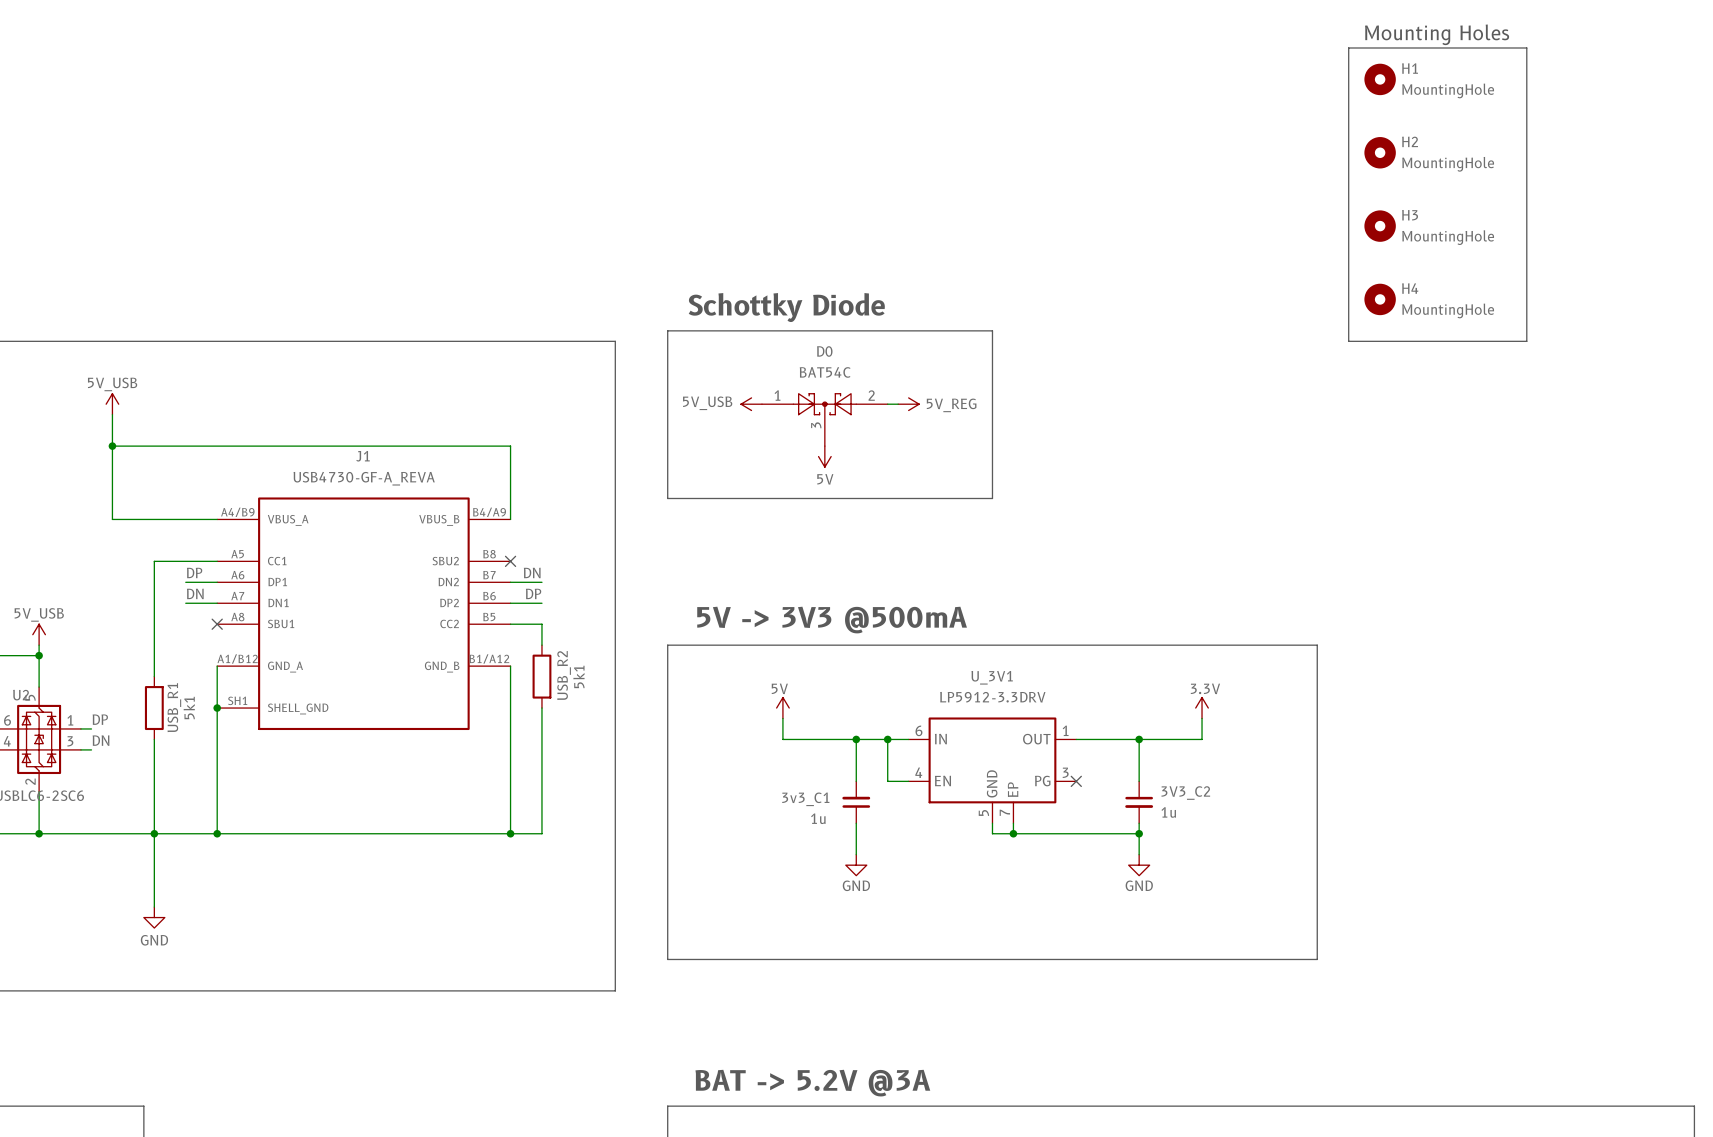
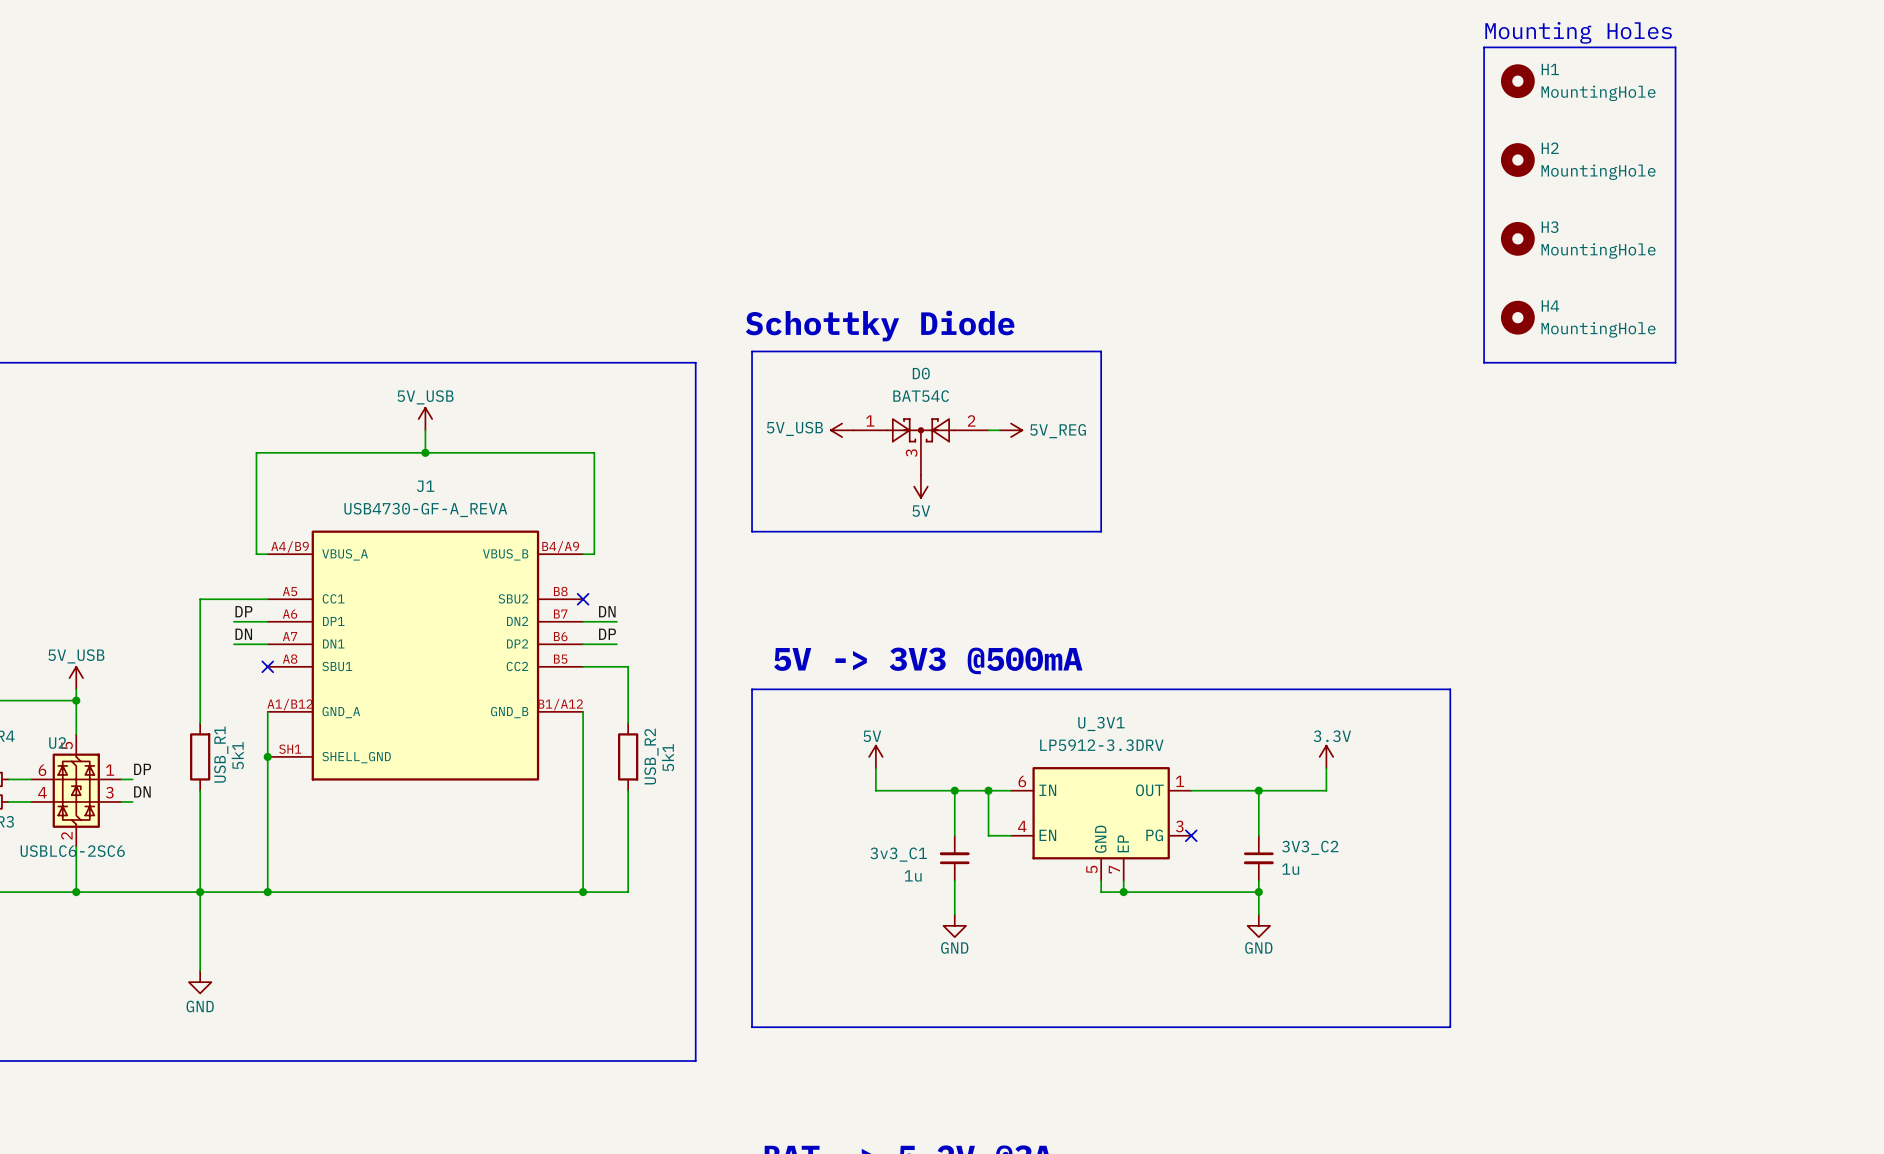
power symbol: none -> 5V_USB (425, 419)
power symbol: 5V_USB (112, 404) -> none
wire: none -> (425, 430) (425, 452)
wire: (112, 414) (112, 519) (206, 519) -> none
junction: none -> (425, 452)
wire: (112, 446) (510, 446) (510, 519) -> (256, 554) (256, 452) (594, 452) (594, 554) (583, 554)
junction: (112, 446) -> none
wire: (541, 624) (541, 645) -> (616, 666) (628, 666) (628, 723)
USB_R2 position: (541, 676) -> (628, 756)
wire: (541, 708) (541, 833) -> (628, 790) (628, 892) (616, 892)

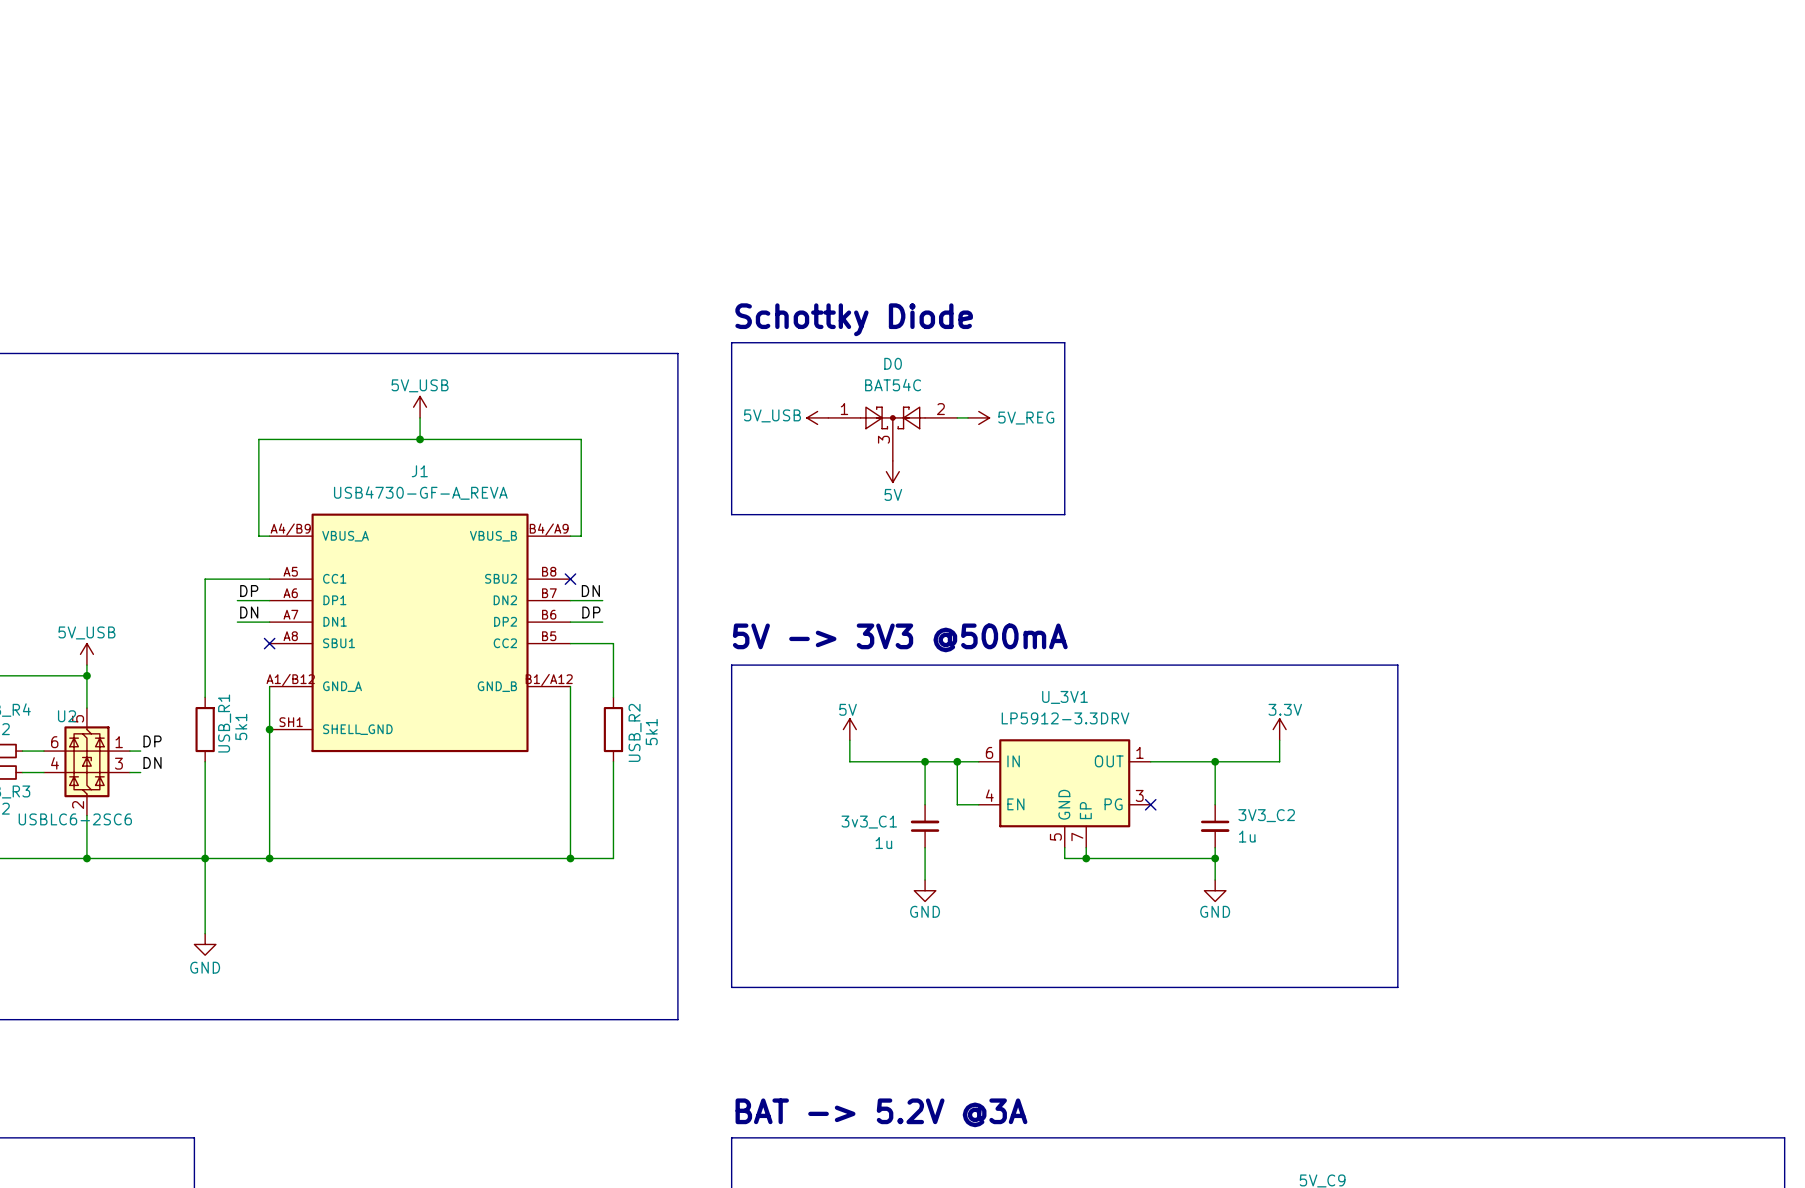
text: Mounting Holes (1578, 32) -> none
line: (1484, 47) (1675, 47) (1675, 362) (1484, 362) (1484, 47) -> none
H1: MountingHole (1517, 81) -> none
H2: MountingHole (1517, 160) -> none
H3: MountingHole (1517, 238) -> none
H4: MountingHole (1517, 317) -> none

